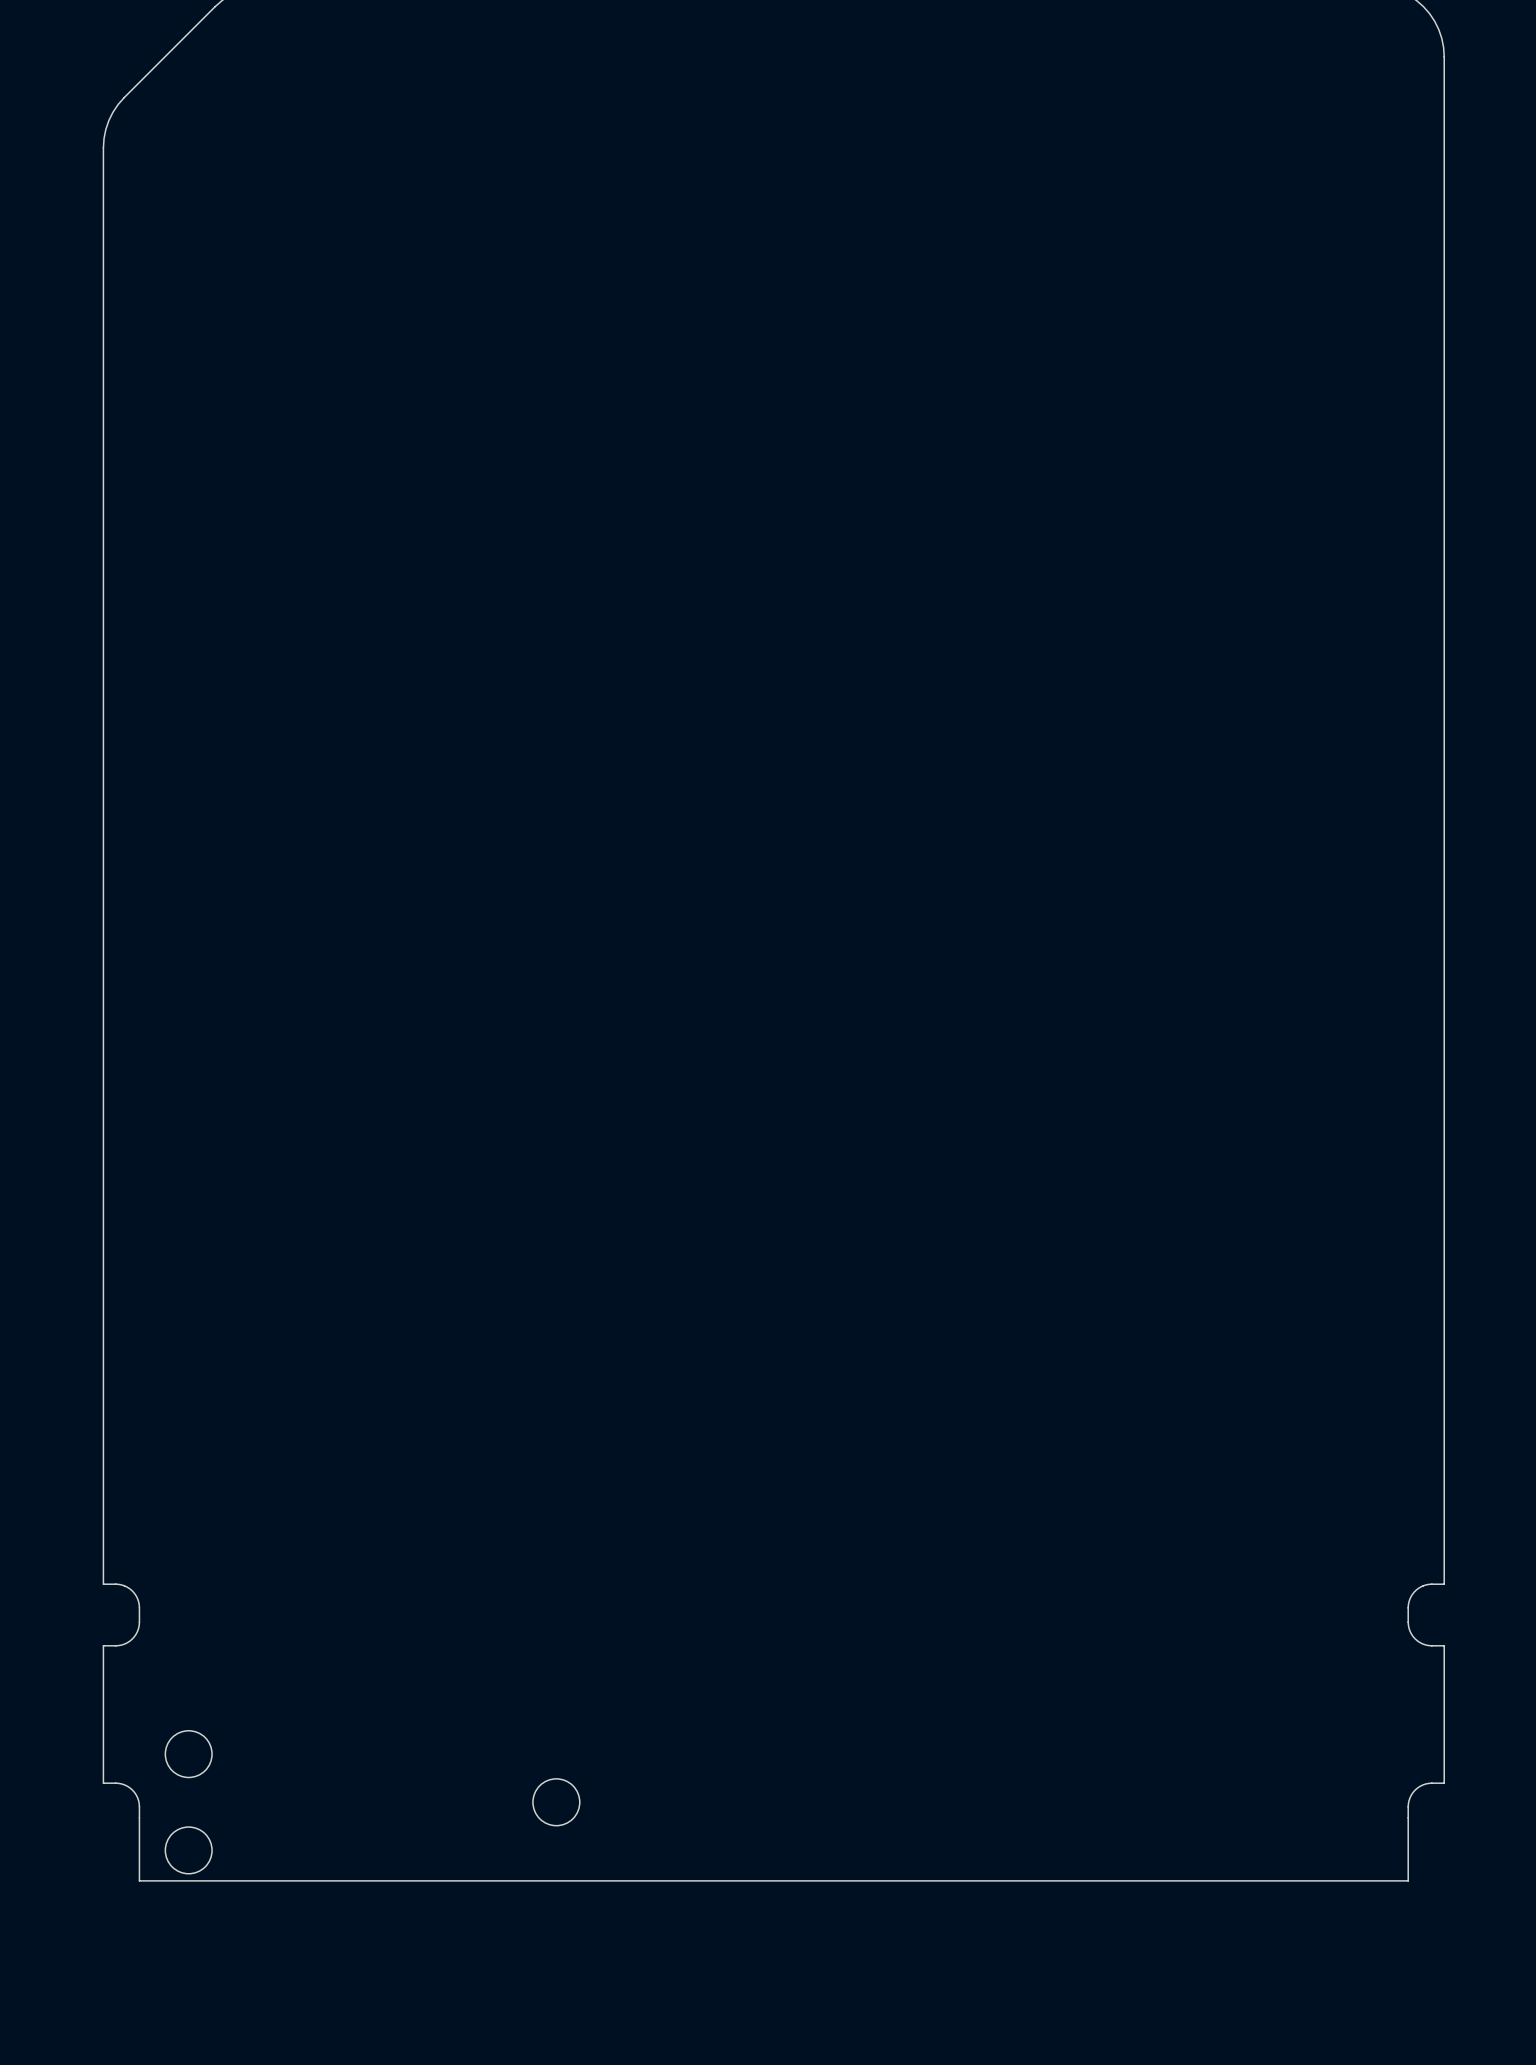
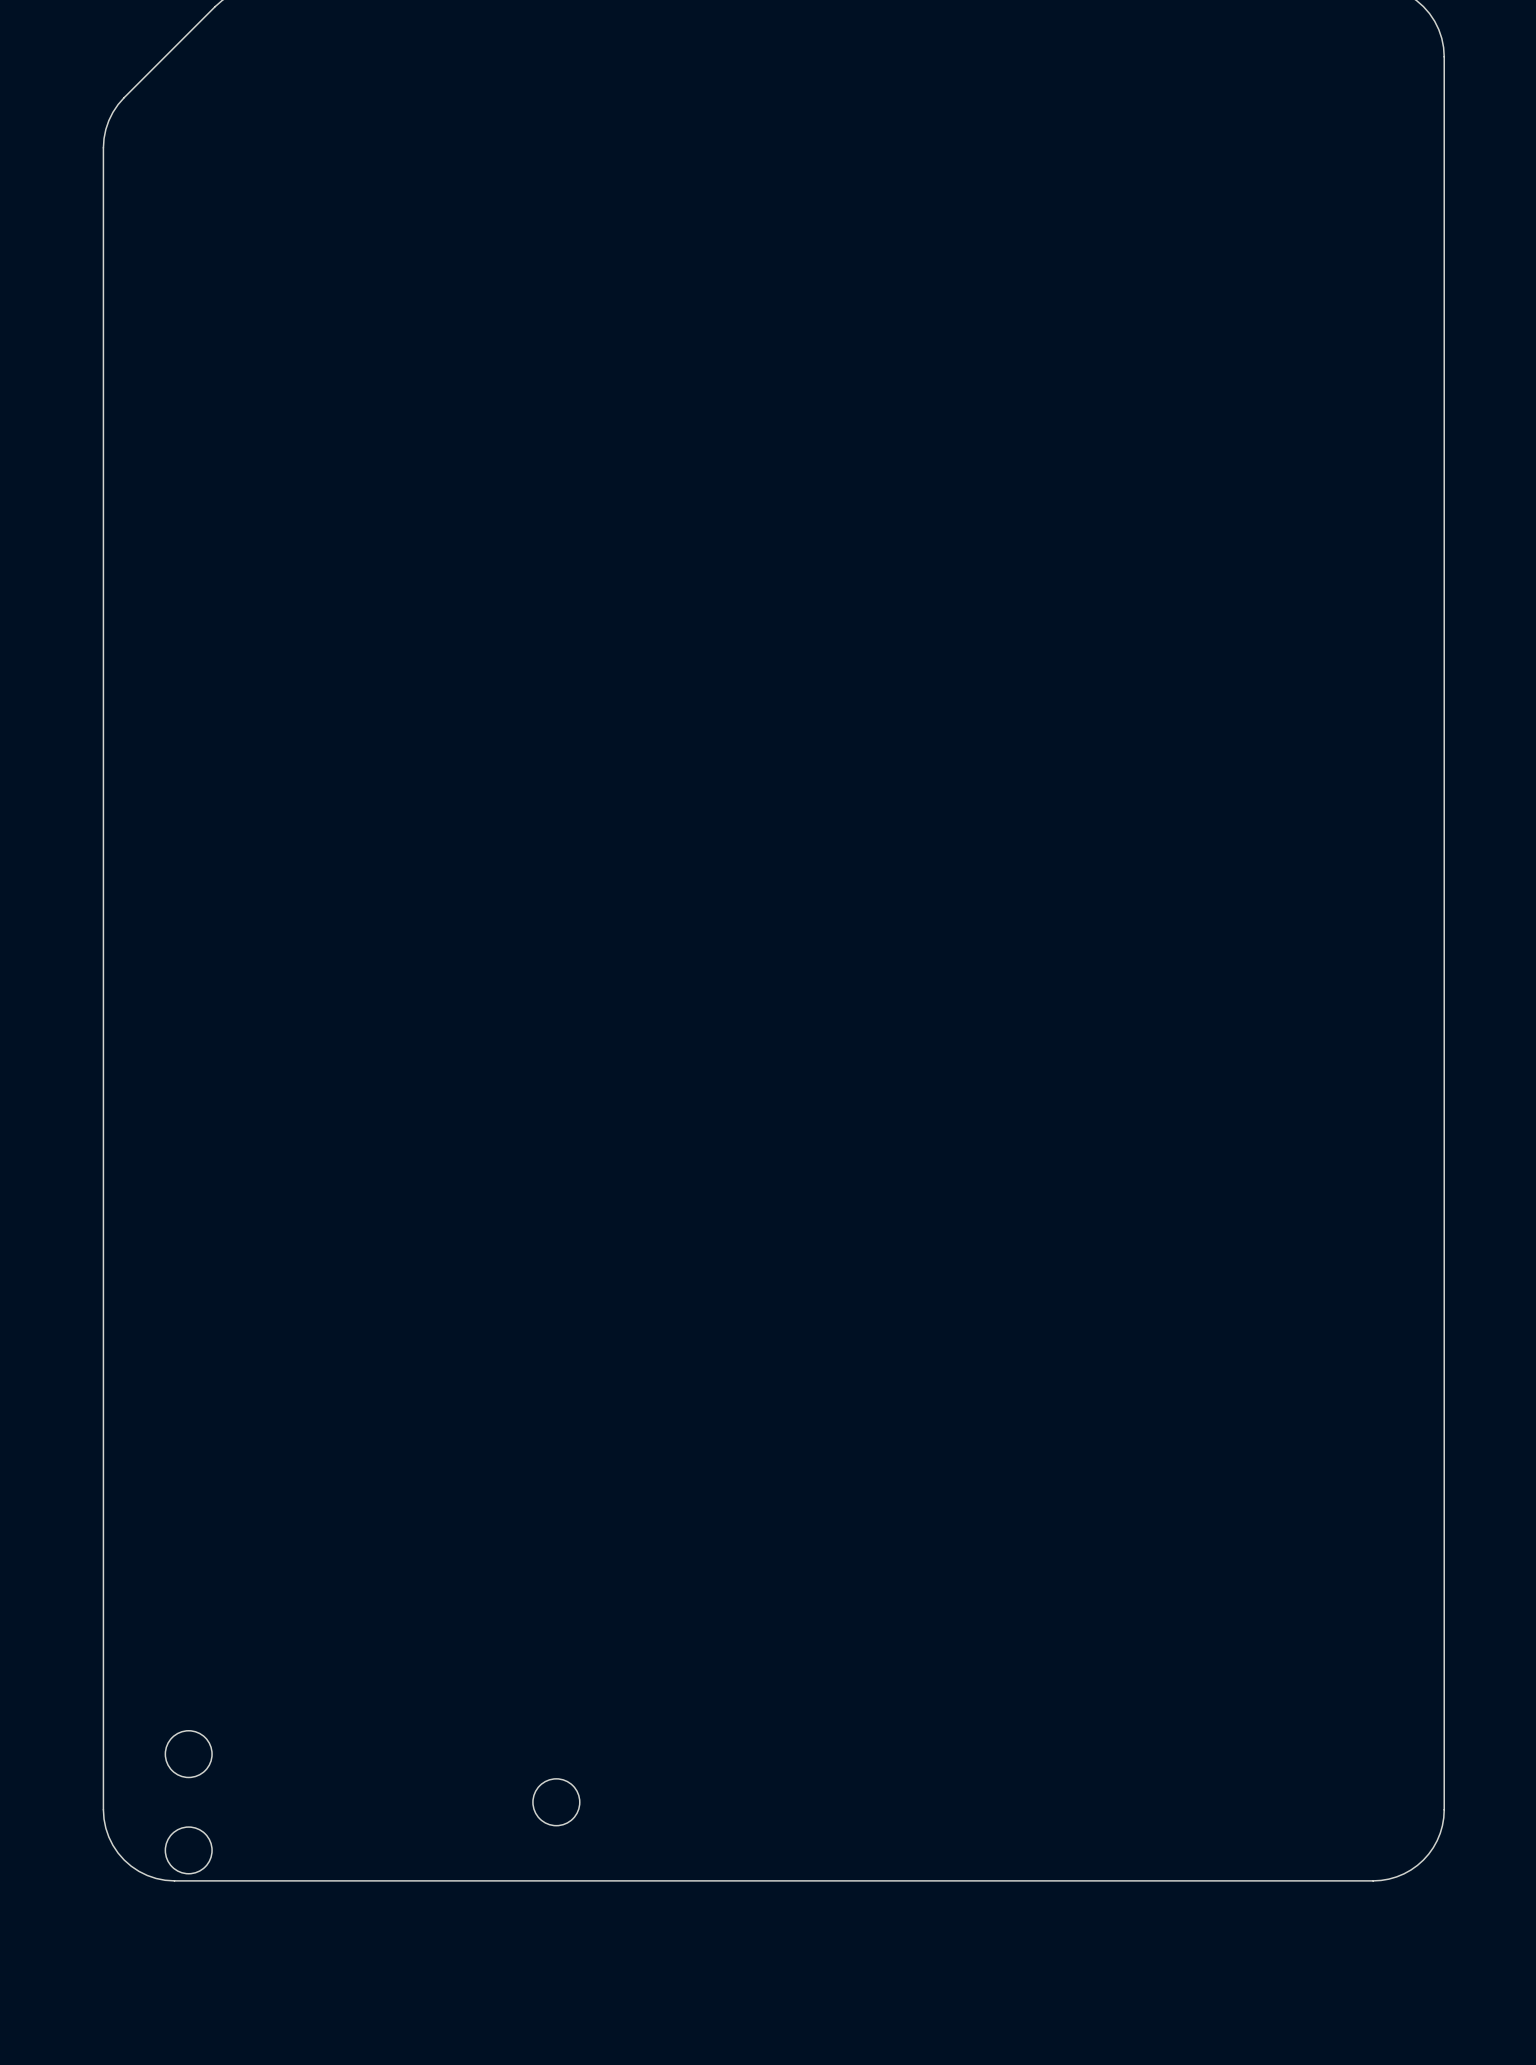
board edge: (103, 1584) (120, 1584) (129, 1588) (136, 1596) (139, 1607) (138, 1628) (132, 1638) (121, 1644) (103, 1645) -> (103, 1584) (103, 1645)
board edge: (1444, 1584) (1427, 1584) (1418, 1588) (1410, 1597) (1408, 1607) (1409, 1628) (1415, 1638) (1425, 1644) (1444, 1645) -> (1444, 1584) (1444, 1645)
board edge: (103, 1783) (124, 1784) (132, 1790) (137, 1797) (139, 1806) (139, 1880) (174, 1880) -> (103, 1783) (105, 1828) (118, 1853) (131, 1866) (147, 1875) (174, 1880)
board edge: (1444, 1783) (1422, 1784) (1415, 1790) (1410, 1797) (1408, 1806) (1408, 1880) (1373, 1880) -> (1444, 1783) (1442, 1825) (1437, 1840) (1428, 1854) (1417, 1865) (1403, 1873) (1388, 1879) (1373, 1880)

